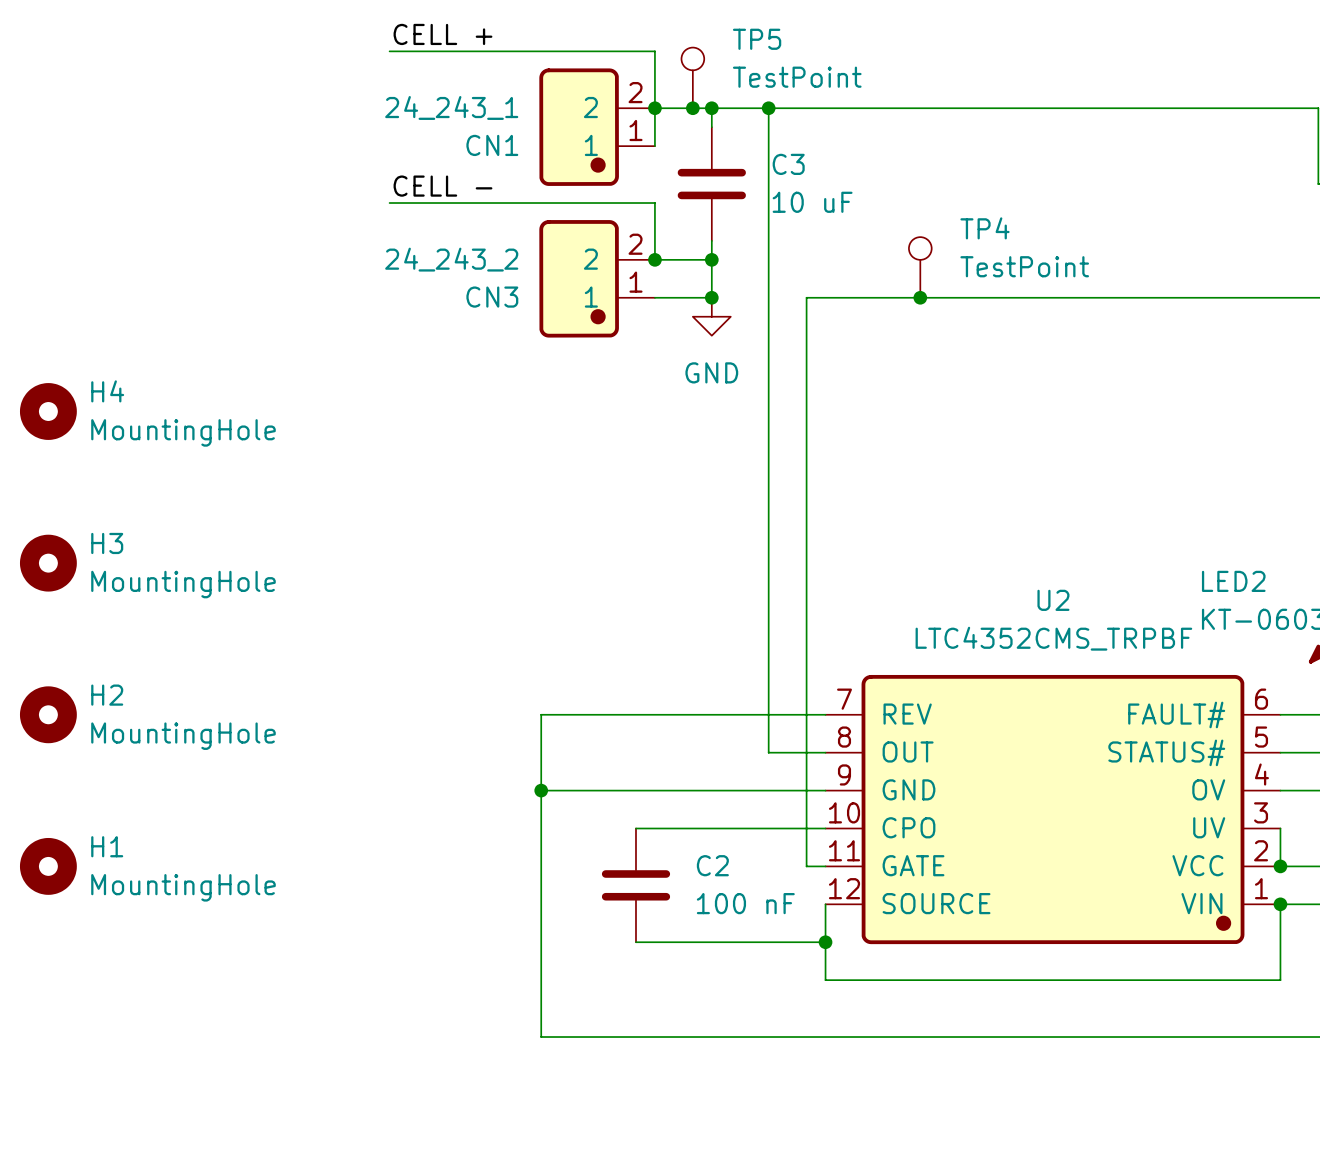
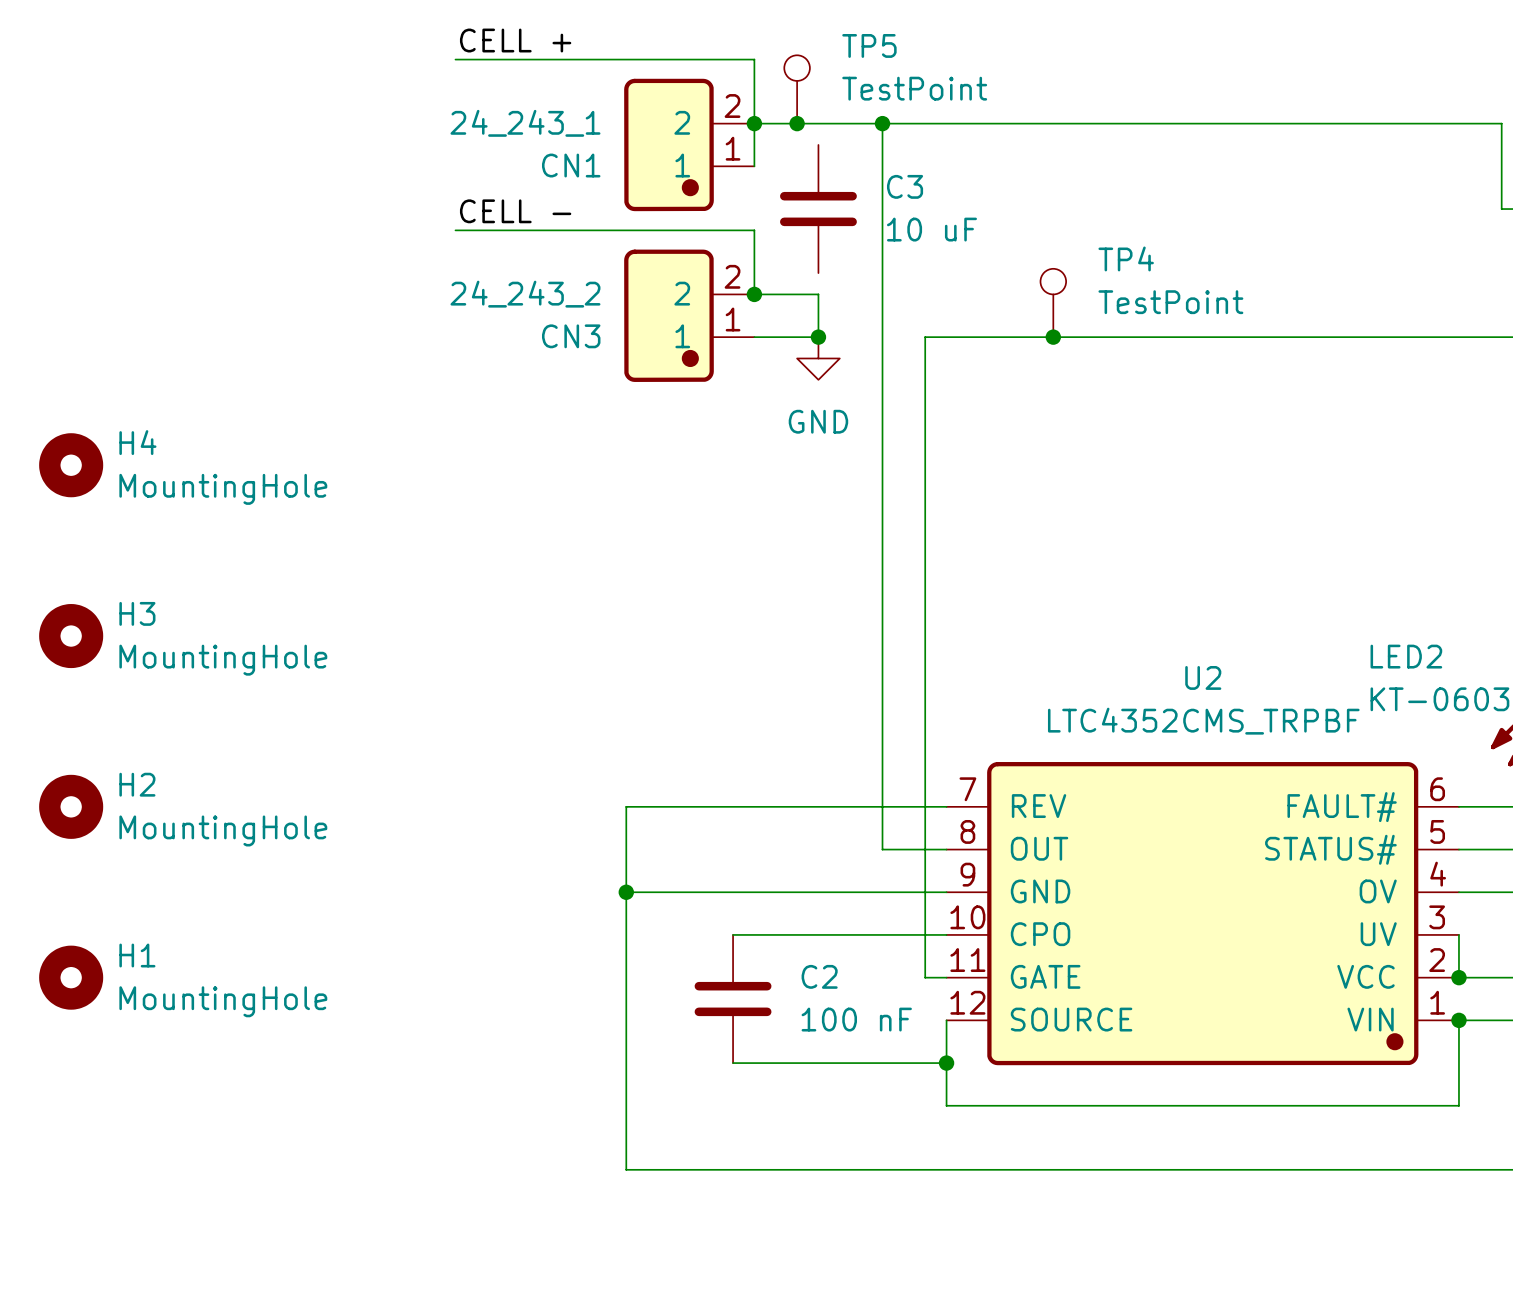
wire: (711, 108) (711, 127) -> none
junction: (711, 108) -> none
wire: (711, 240) (711, 259) -> none
junction: (711, 259) -> none

